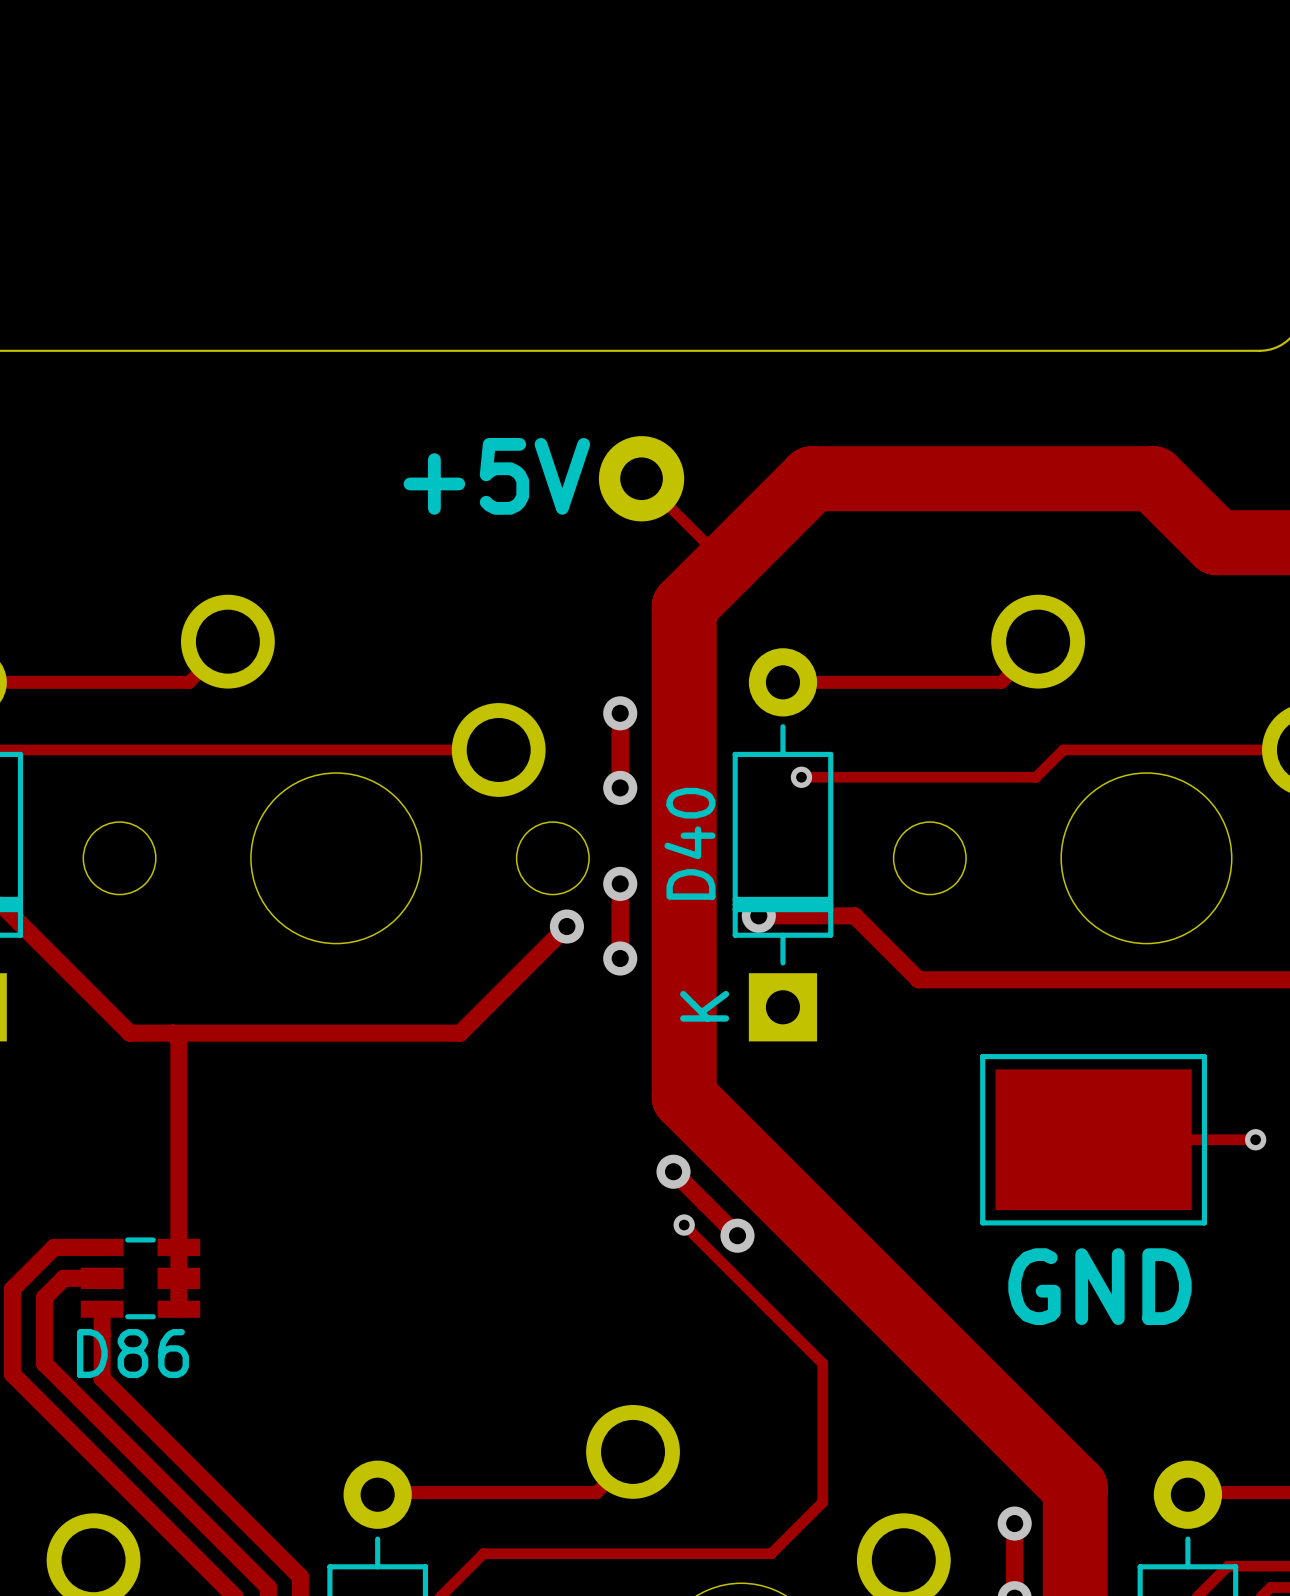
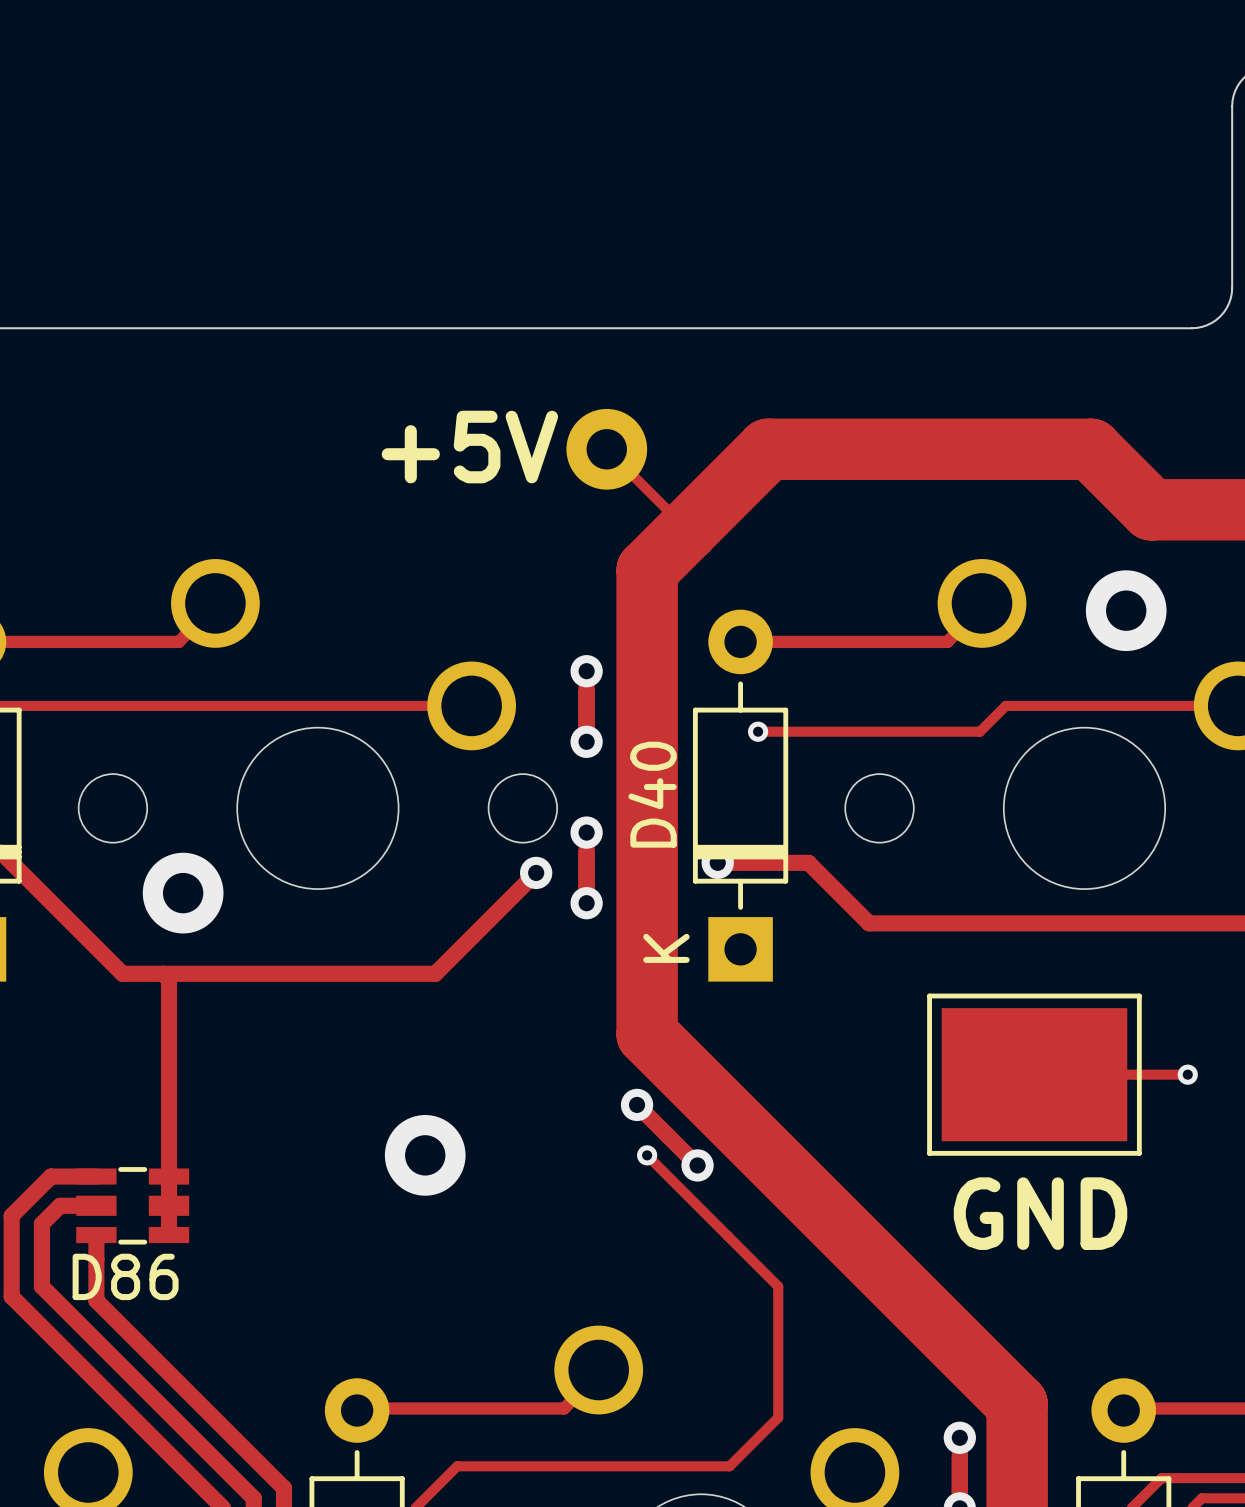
via: none -> (1126, 610)
via: none -> (183, 893)
via: none -> (425, 1155)

